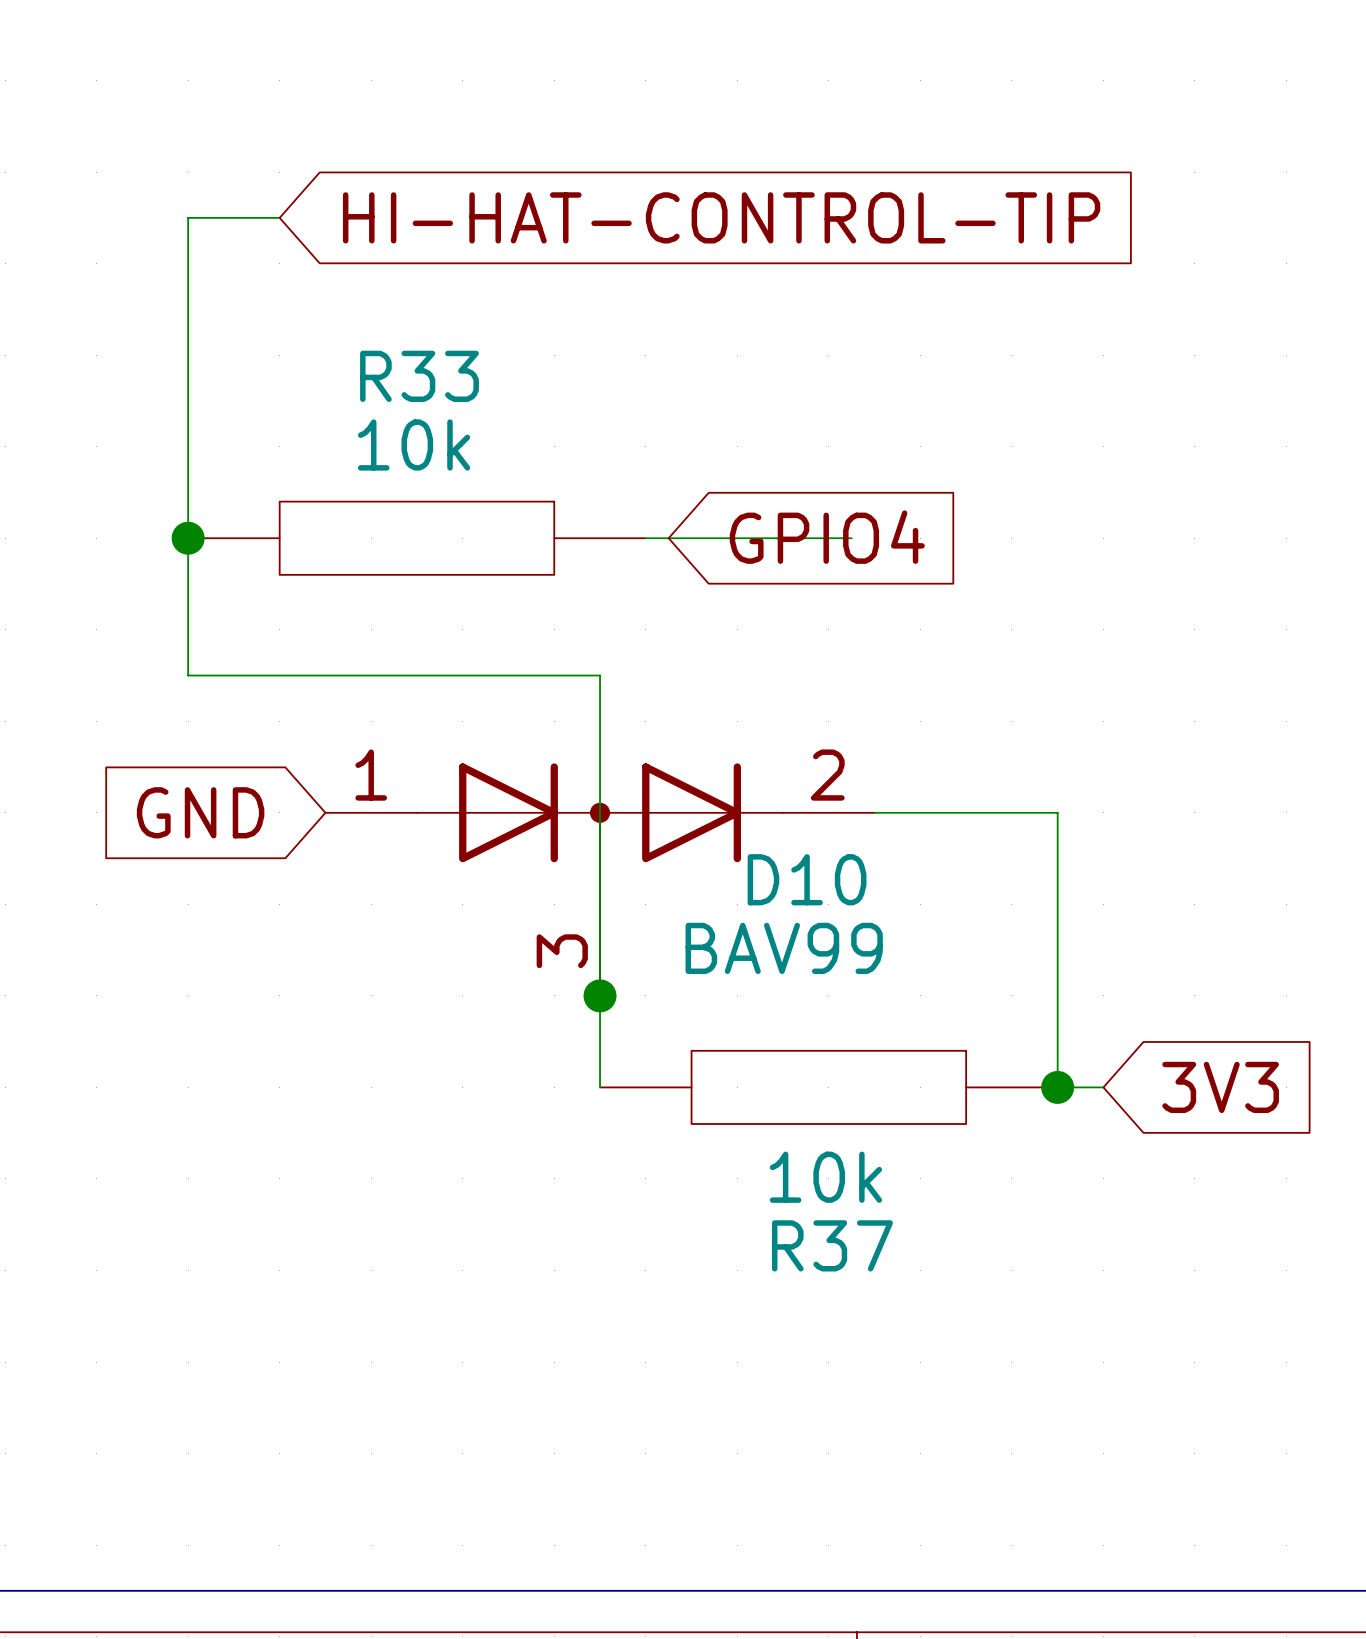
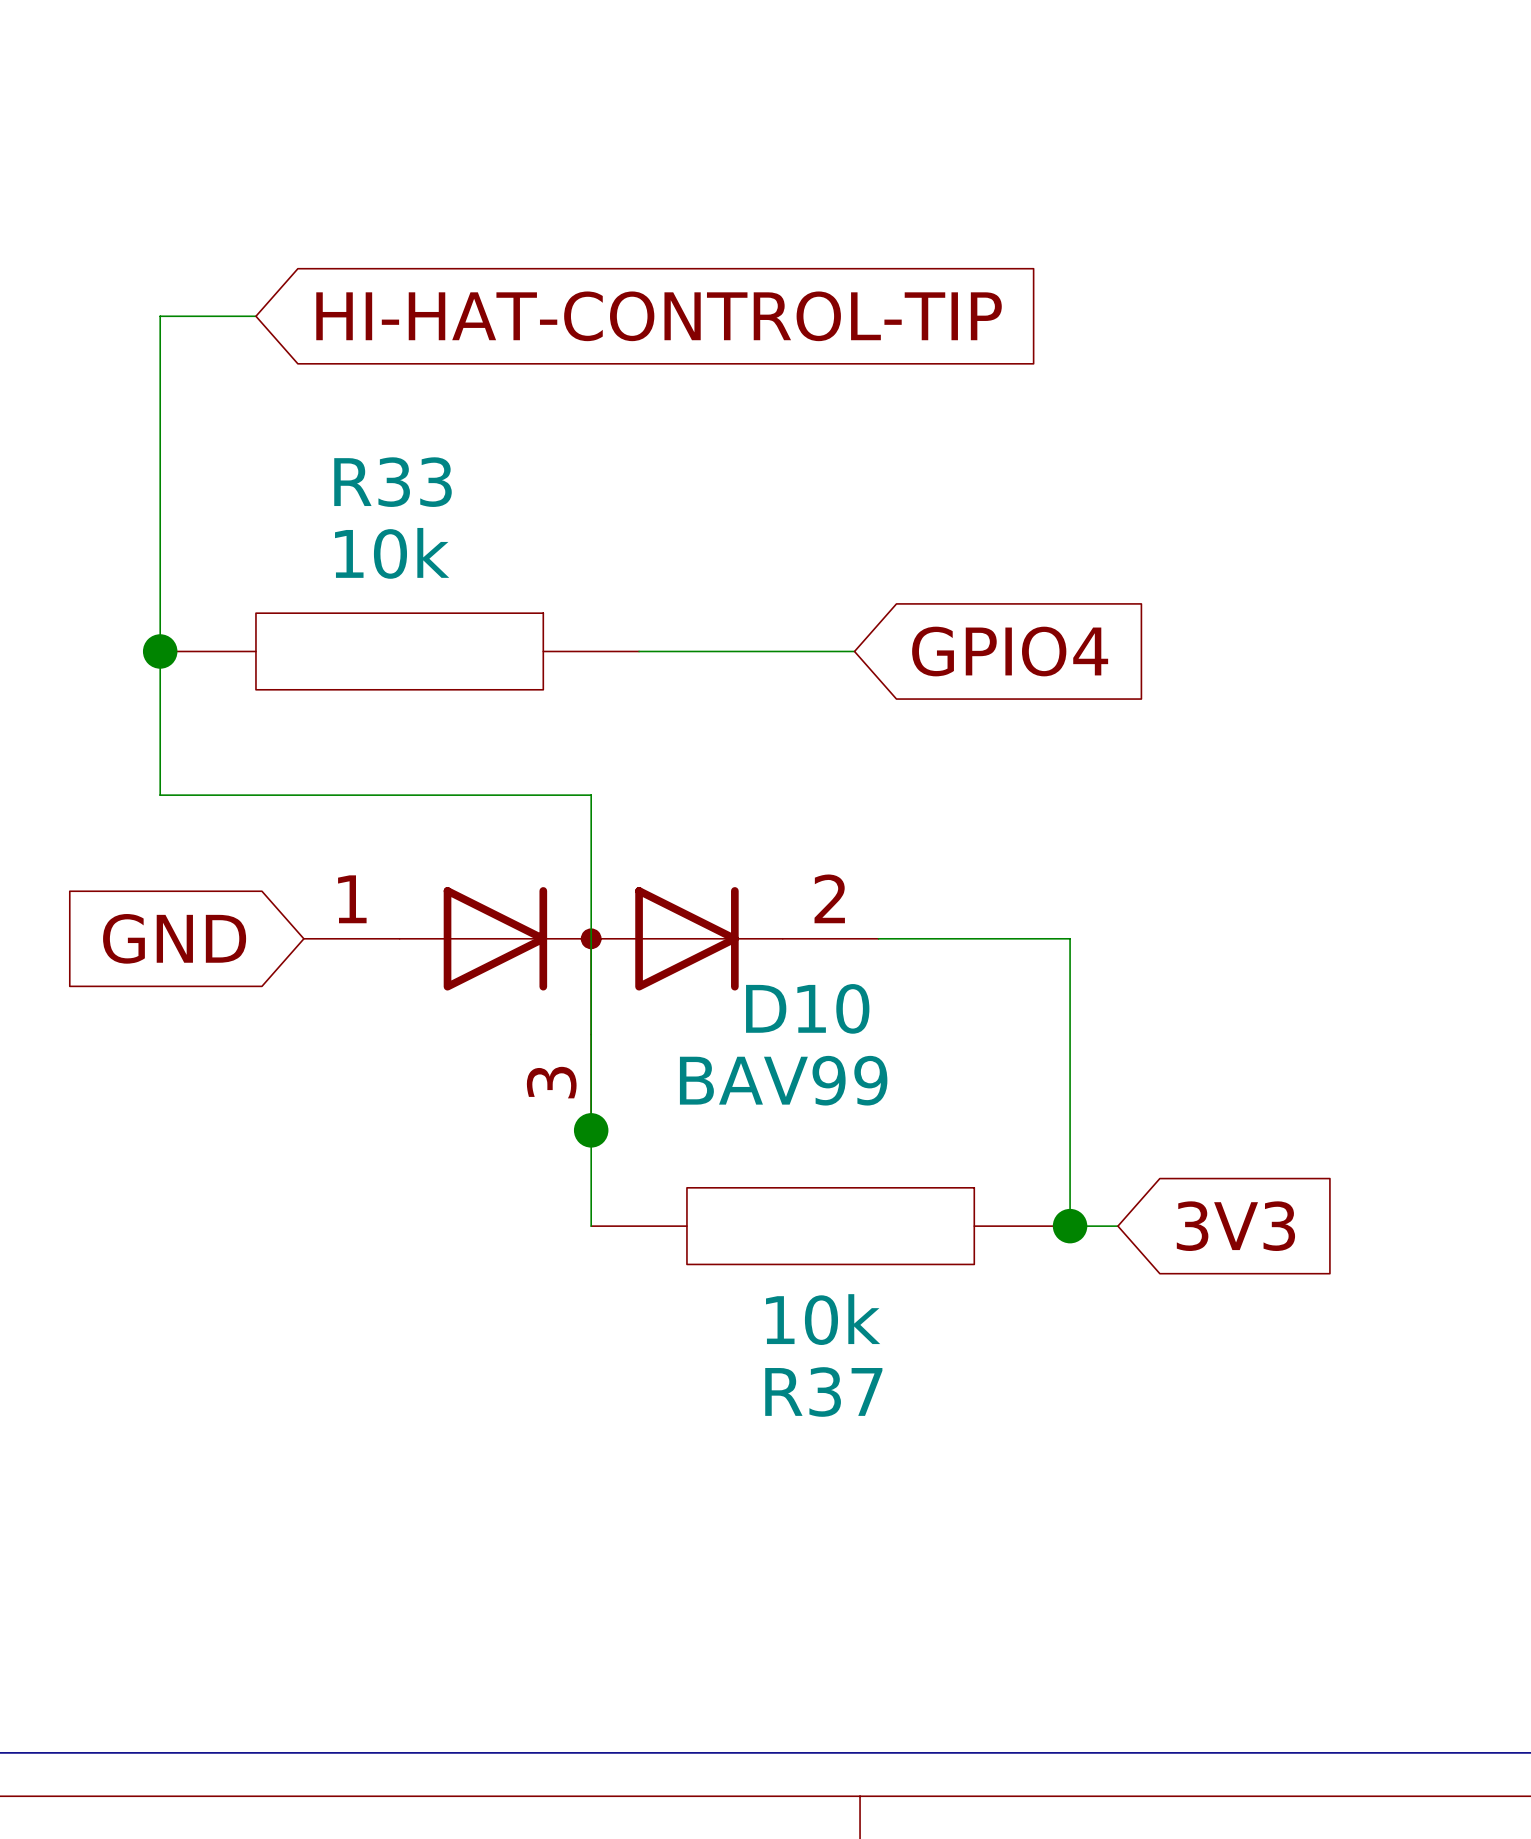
global label position: GPIO4 (827, 537) -> GPIO4 (1010, 651)

